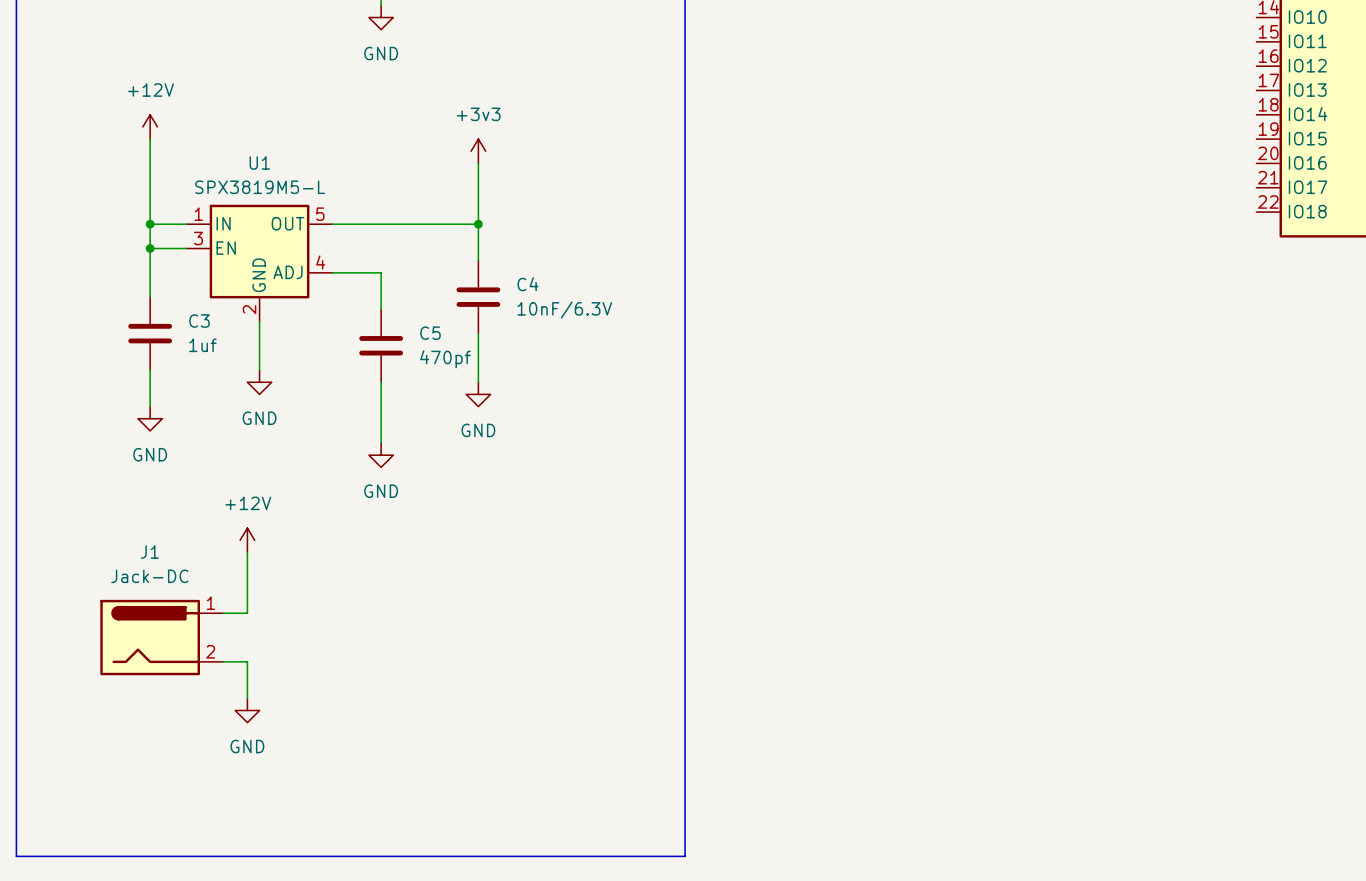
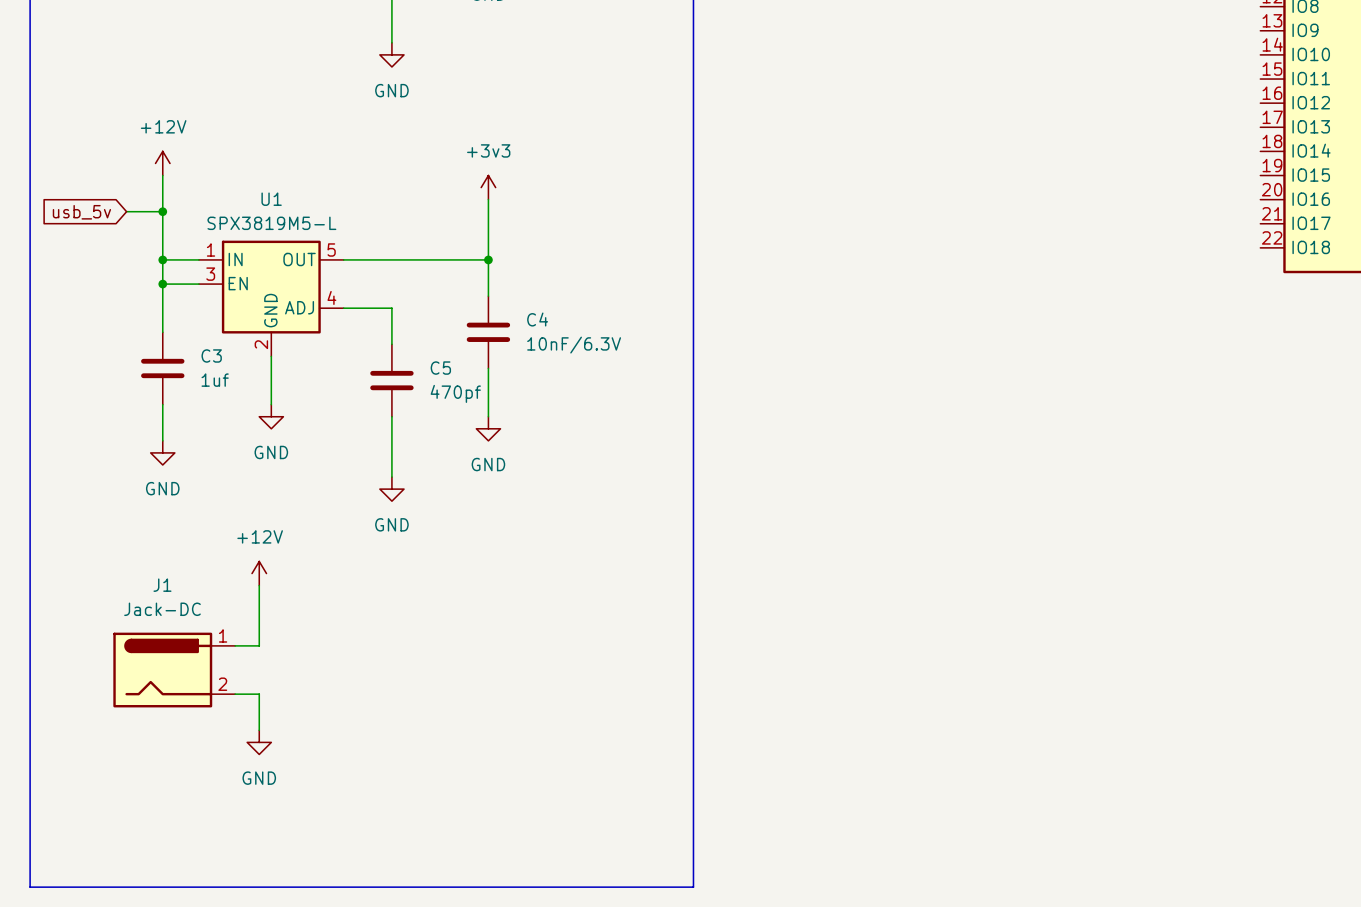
wire: none -> (126, 211) (162, 211)
junction: none -> (162, 211)
global label: none -> usb_5v (81, 212)

